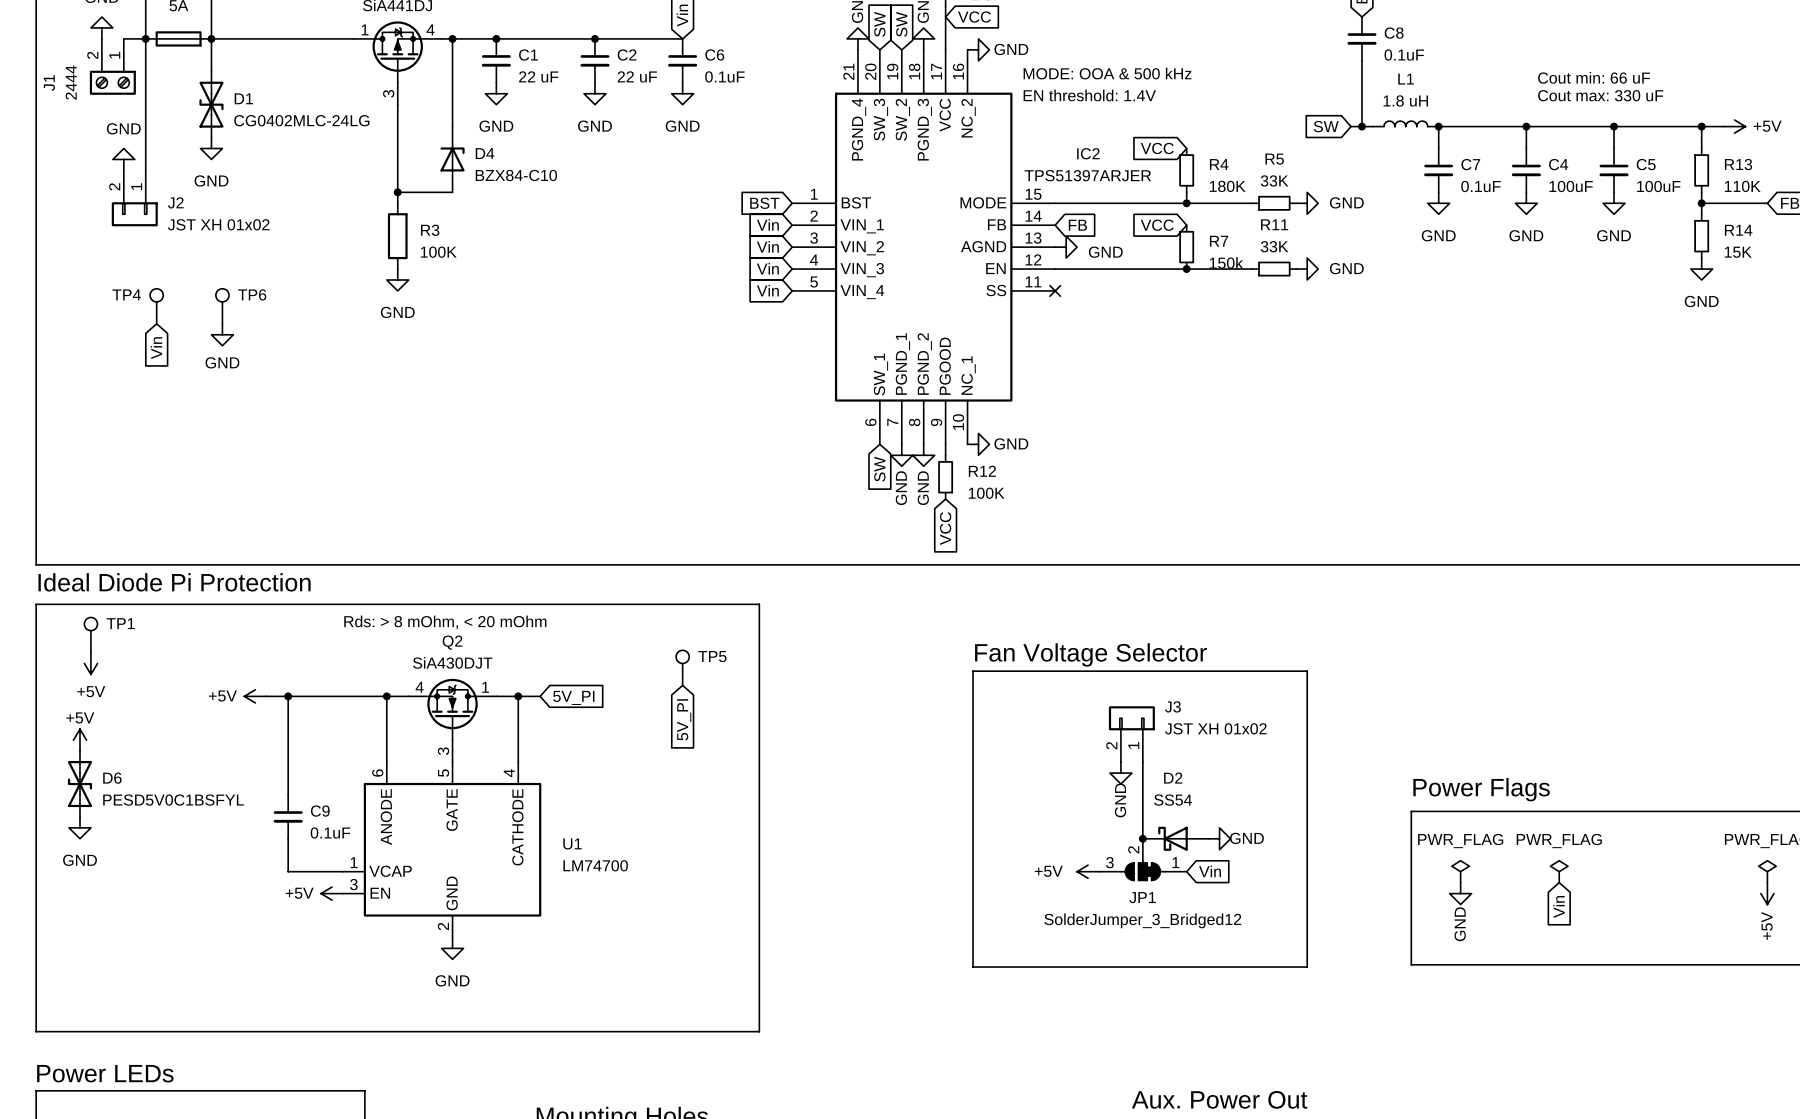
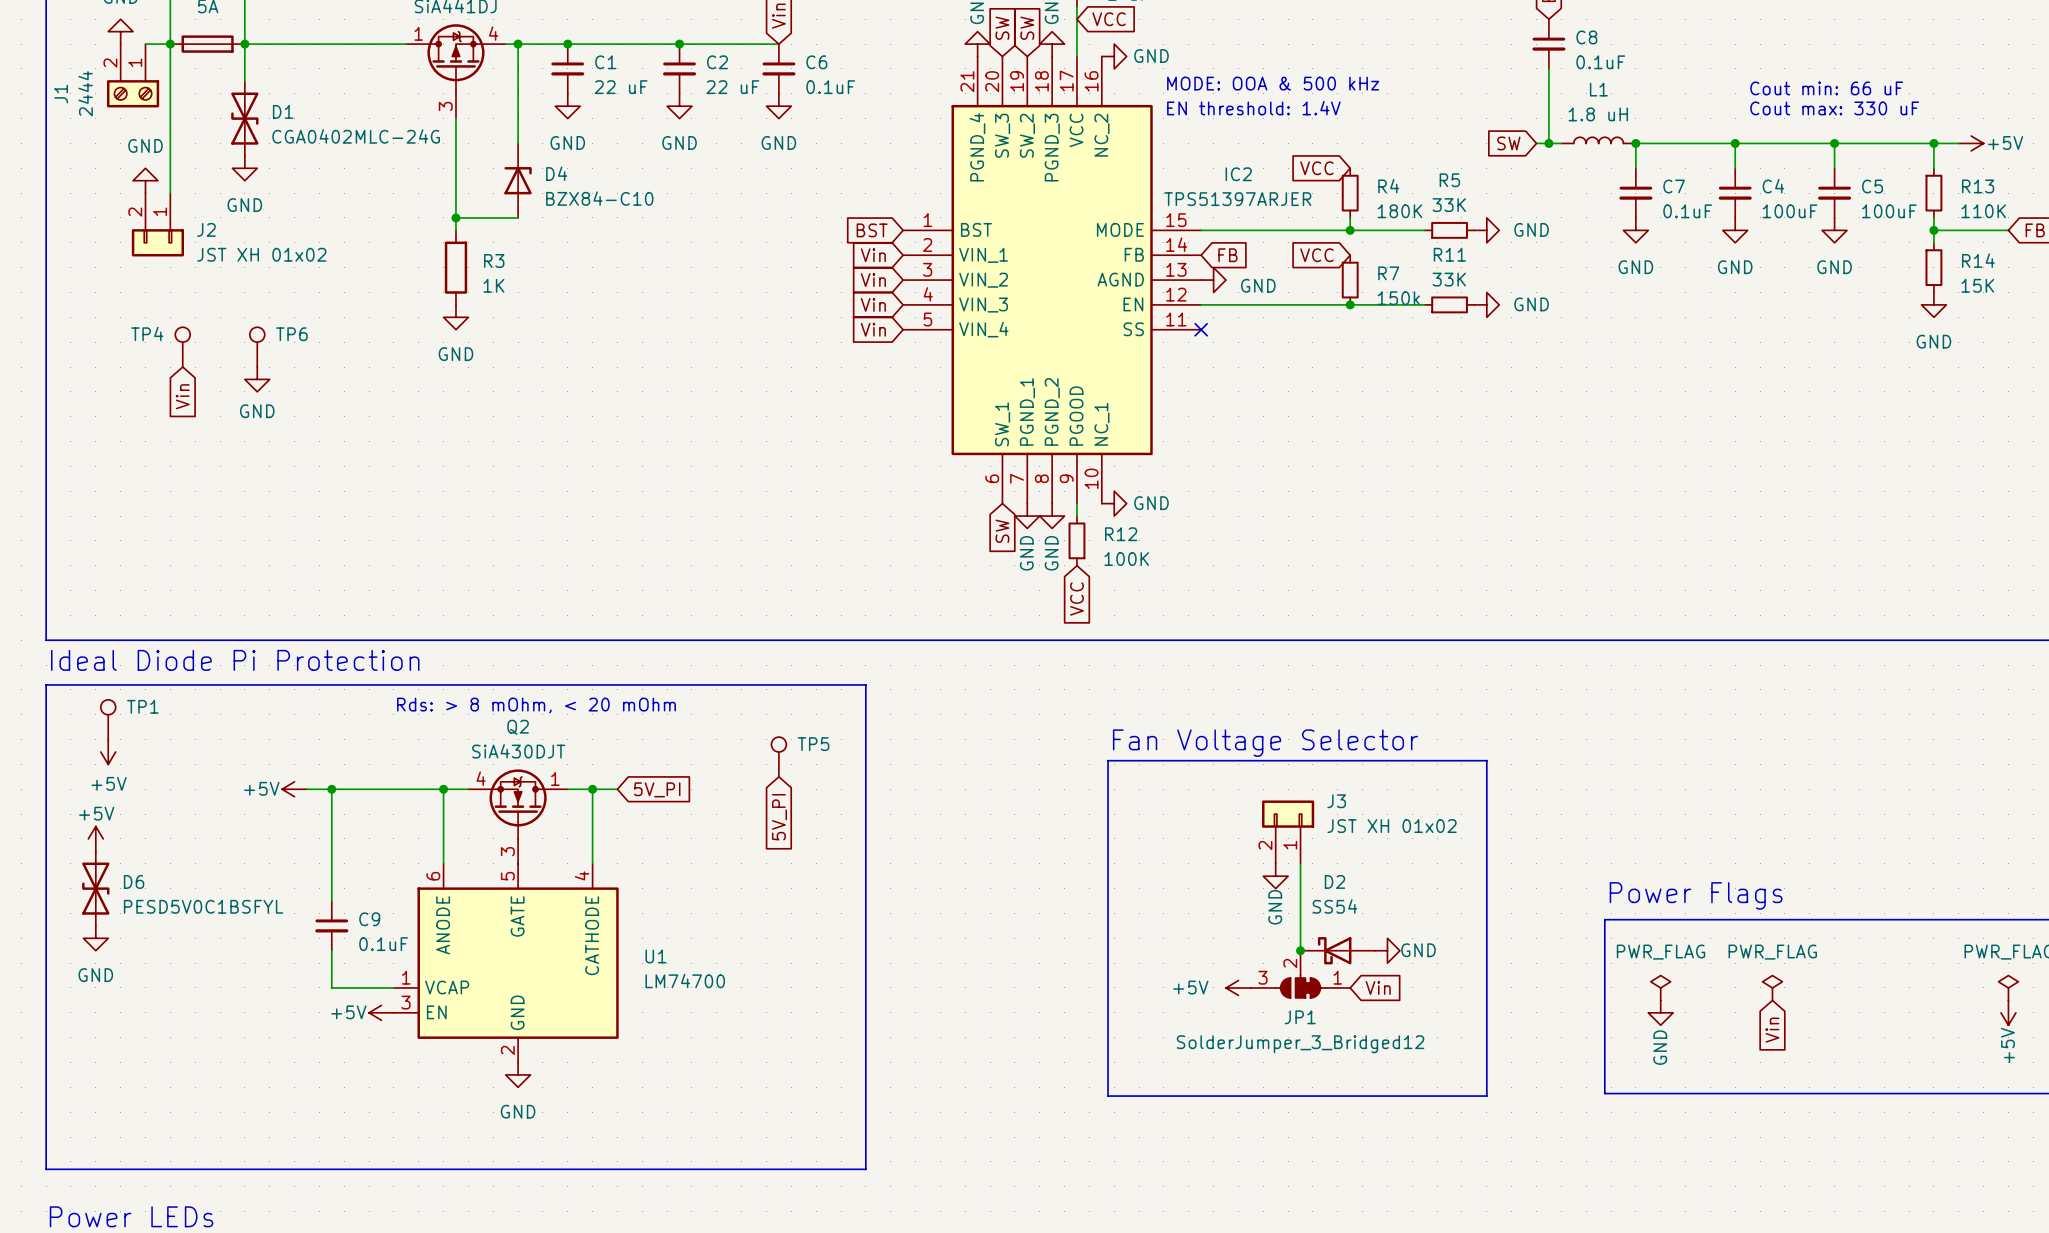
D1 value: CG0402MLC-24LG (301, 120) -> CGA0402MLC-24G (356, 136)
R3 value: 100K (438, 252) -> 1K (493, 285)

